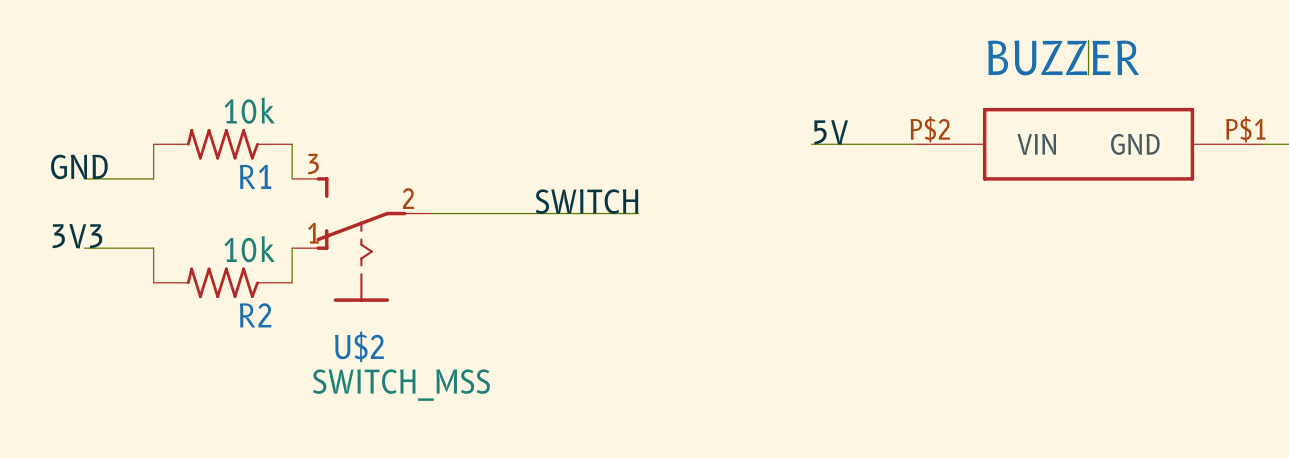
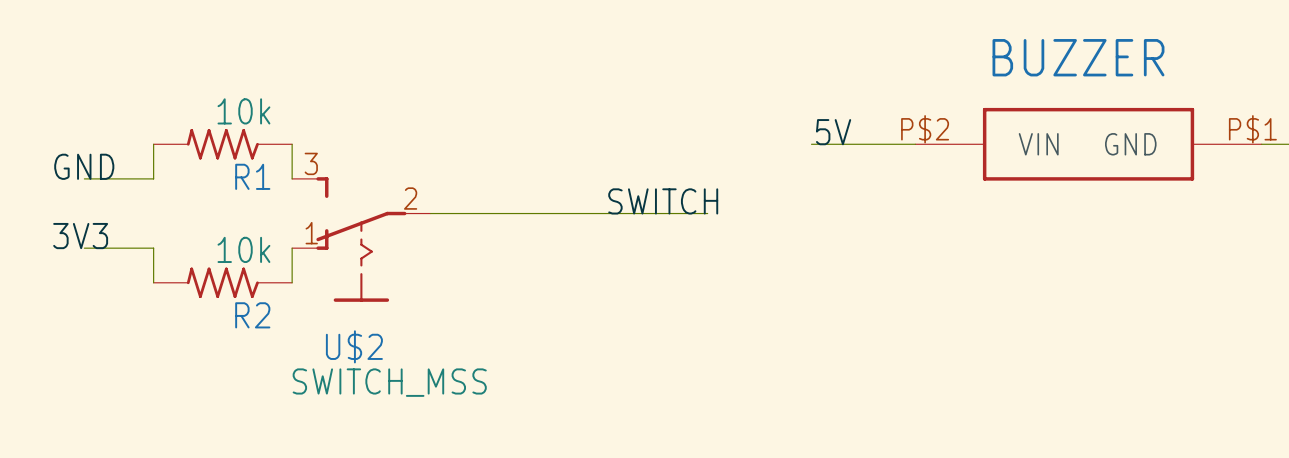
wire: (1088, 40) (1088, 75) -> none
label position: SWITCH (586, 201) -> SWITCH (663, 201)
wire: none -> (638, 213) (707, 213)

